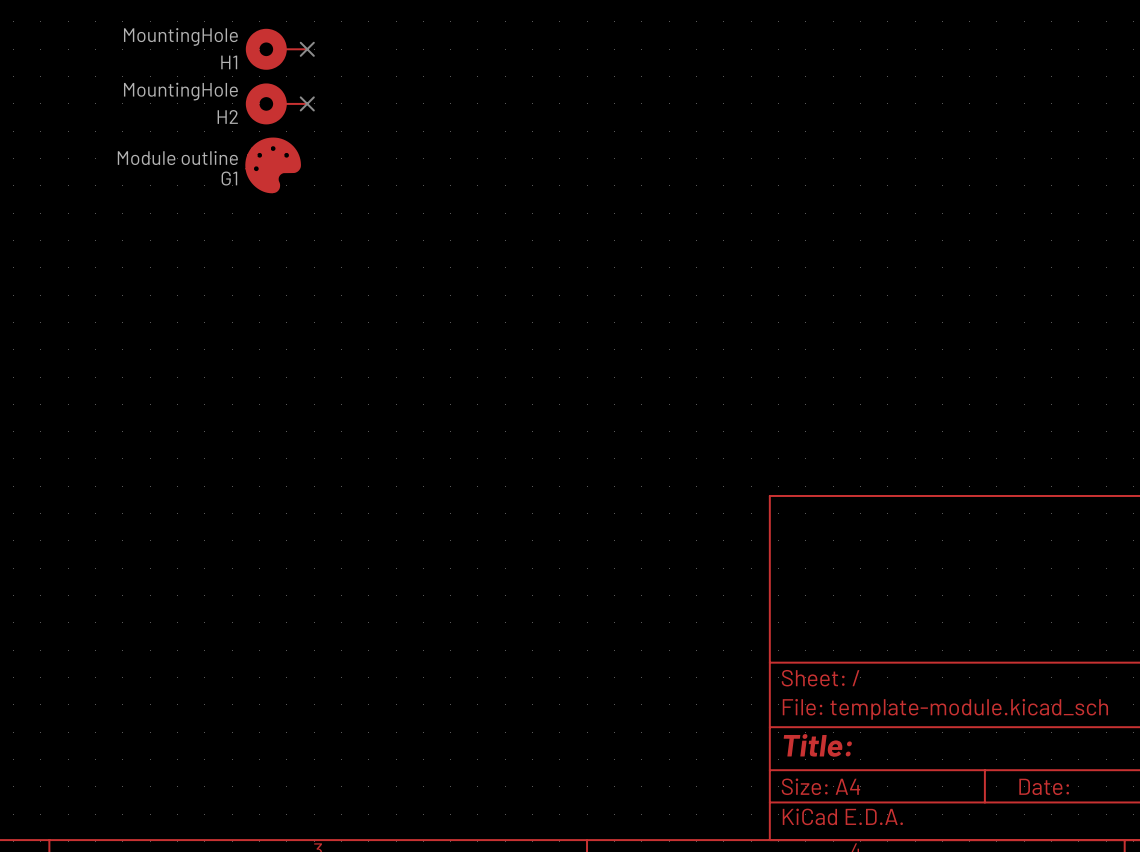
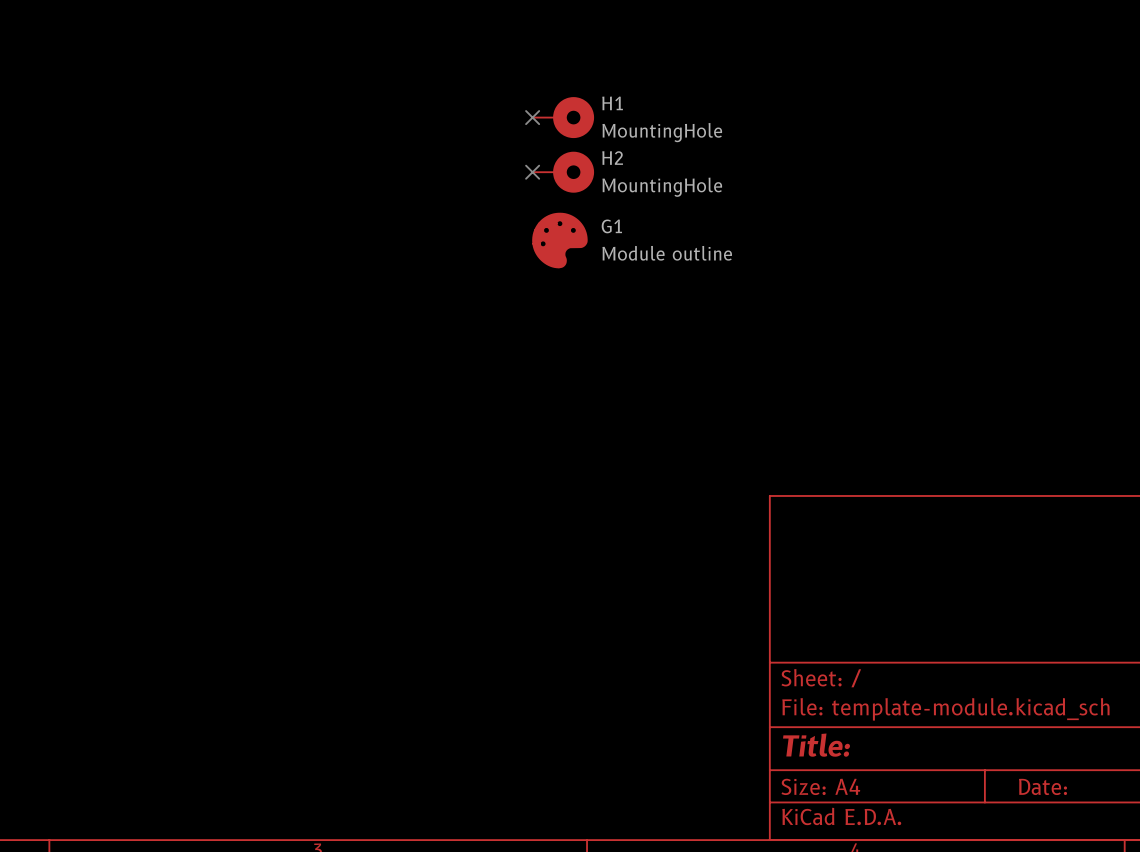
H1 rotation: 0° (266, 49) -> 180° (573, 117)
H1 position: (276, 49) -> (563, 117)
no-connect mark: (307, 49) -> none
H2 rotation: 0° (266, 103) -> 180° (573, 172)
H2 position: (276, 103) -> (563, 172)
no-connect mark: (307, 103) -> none
no-connect mark: none -> (532, 117)
G1 value position: Module outline (177, 158) -> Module outline (667, 253)
G1 position: (273, 165) -> (559, 240)
no-connect mark: none -> (532, 172)
G1 name position: G1 (229, 178) -> G1 (611, 226)

